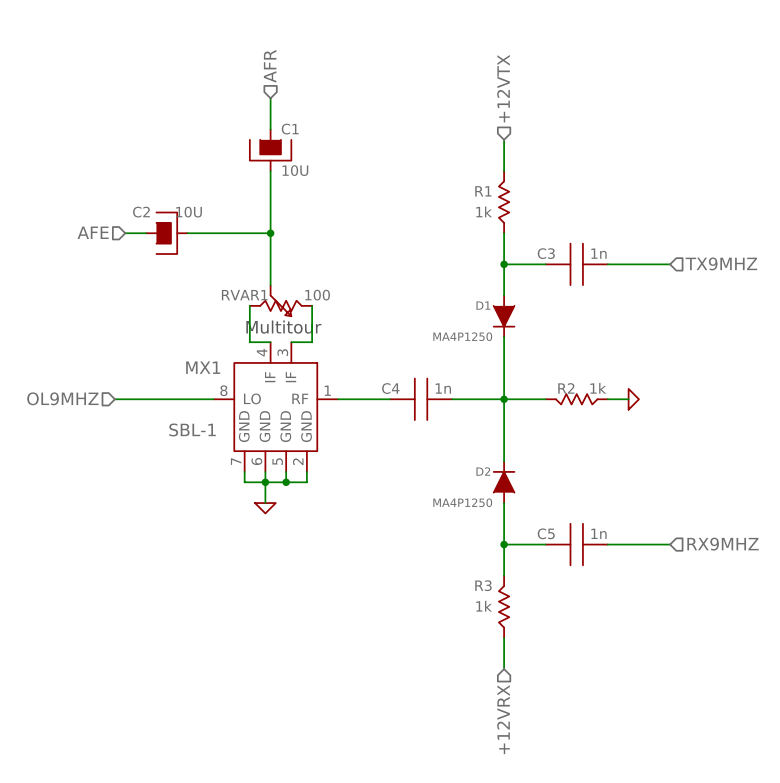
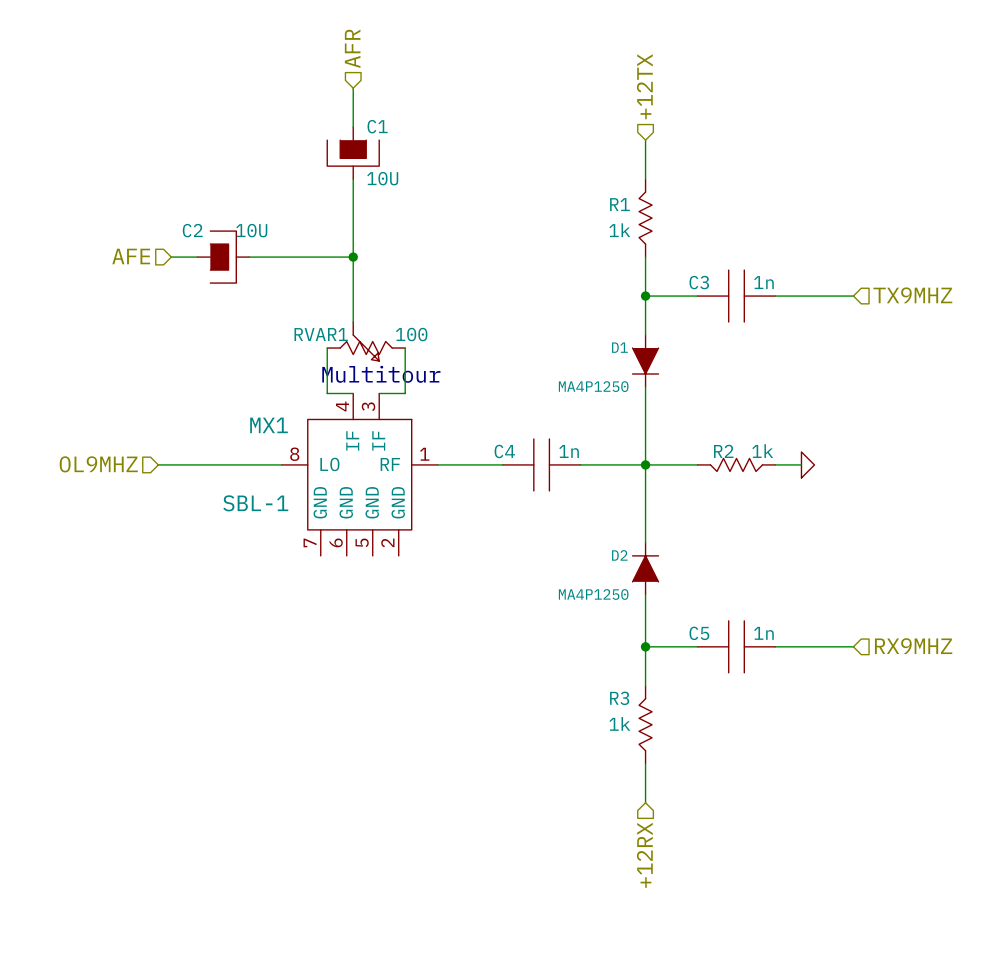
hierarchical label: +12VTX (503, 88) -> +12TX (644, 86)
wire: (244, 471) (244, 482) (306, 482) (306, 471) -> none
wire: (265, 471) (265, 503) -> none
wire: (286, 471) (286, 482) -> none
junction: (265, 482) -> none
junction: (286, 482) -> none
power symbol: (265, 508) -> none
hierarchical label: +12VRX (503, 719) -> +12RX (644, 855)

